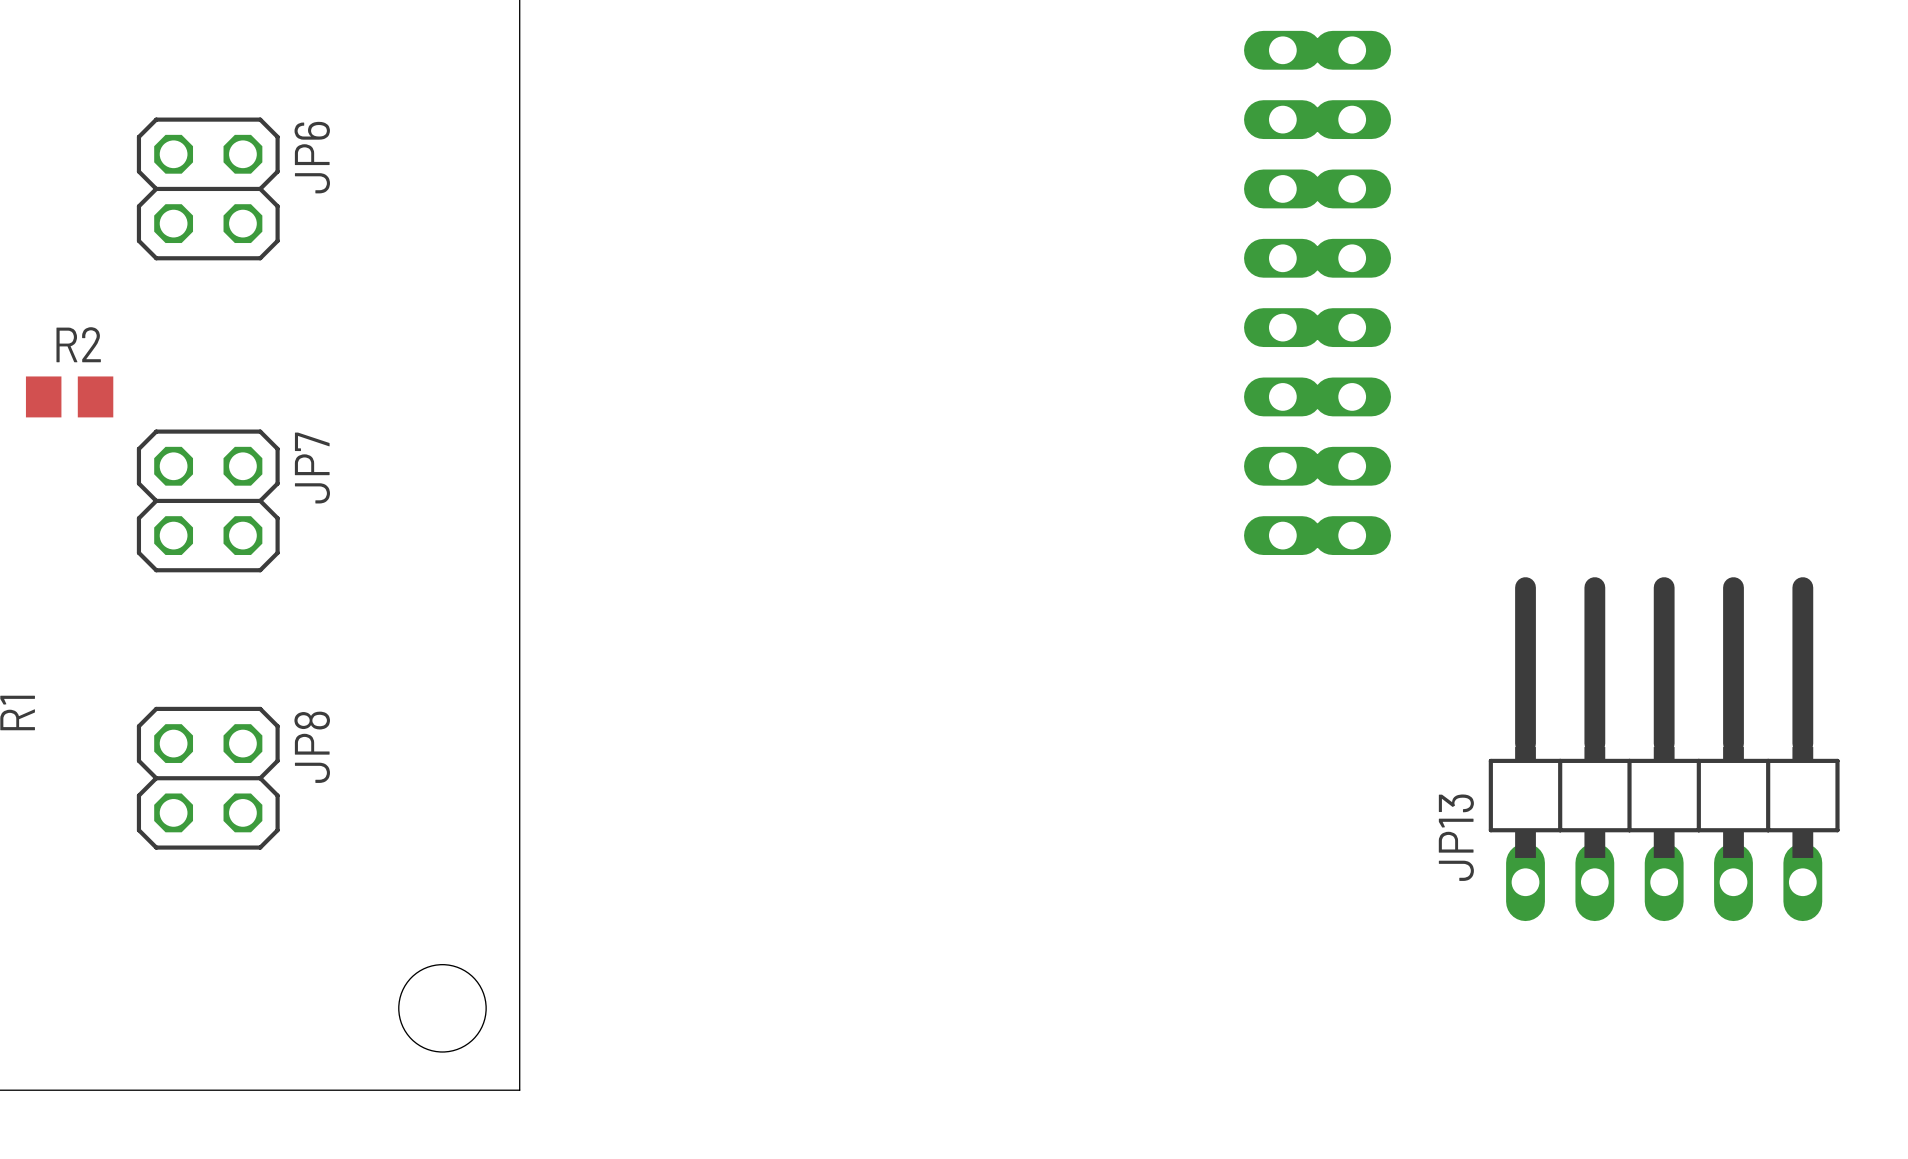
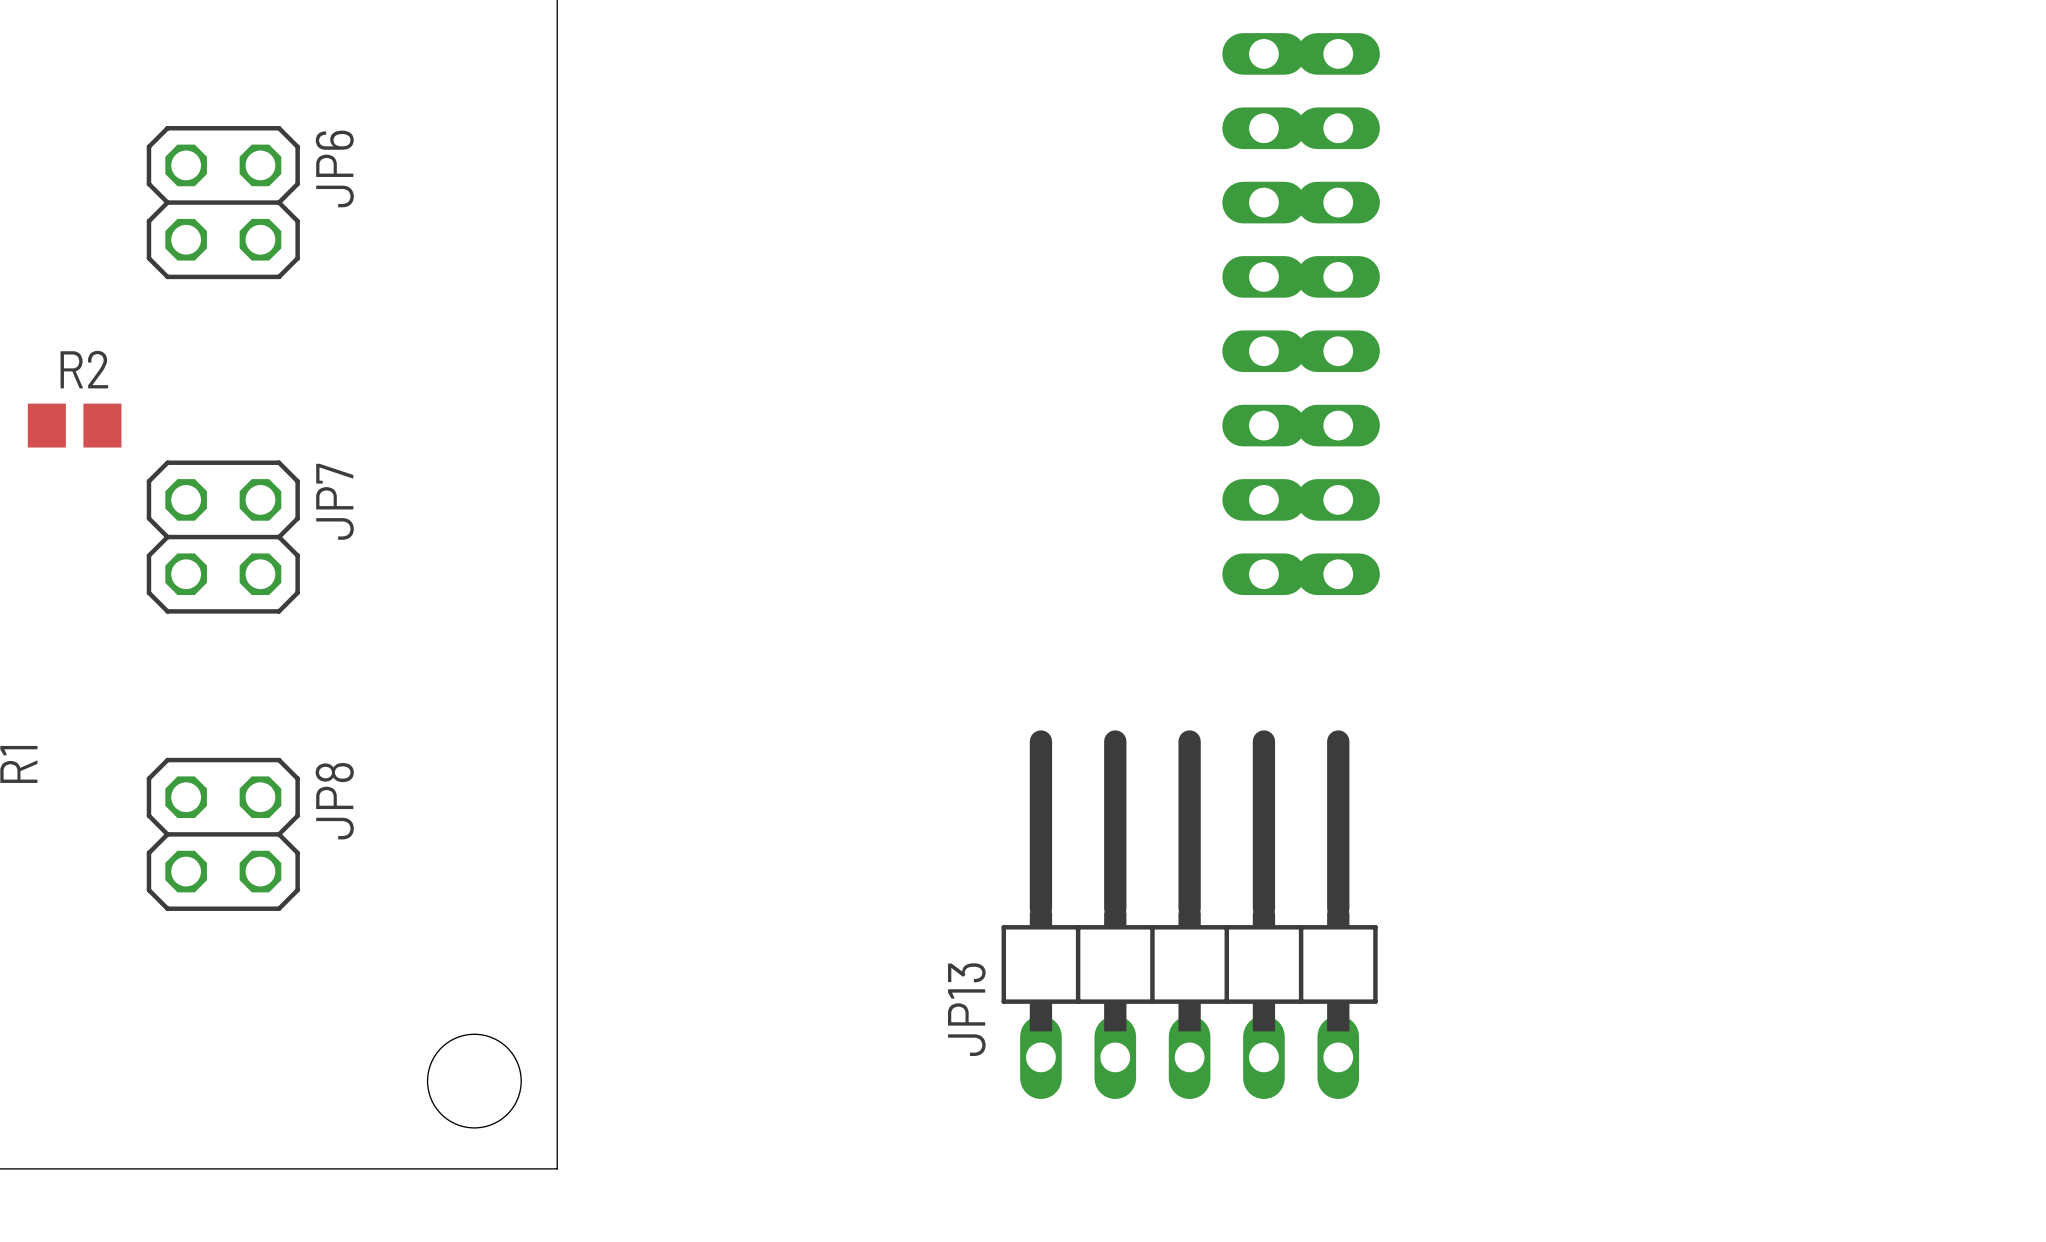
part: none -> (1263, 314)
part position: (1282, 292) -> (1338, 314)
part: (1352, 292) -> none
JP13 position: (1664, 749) -> (1189, 914)

